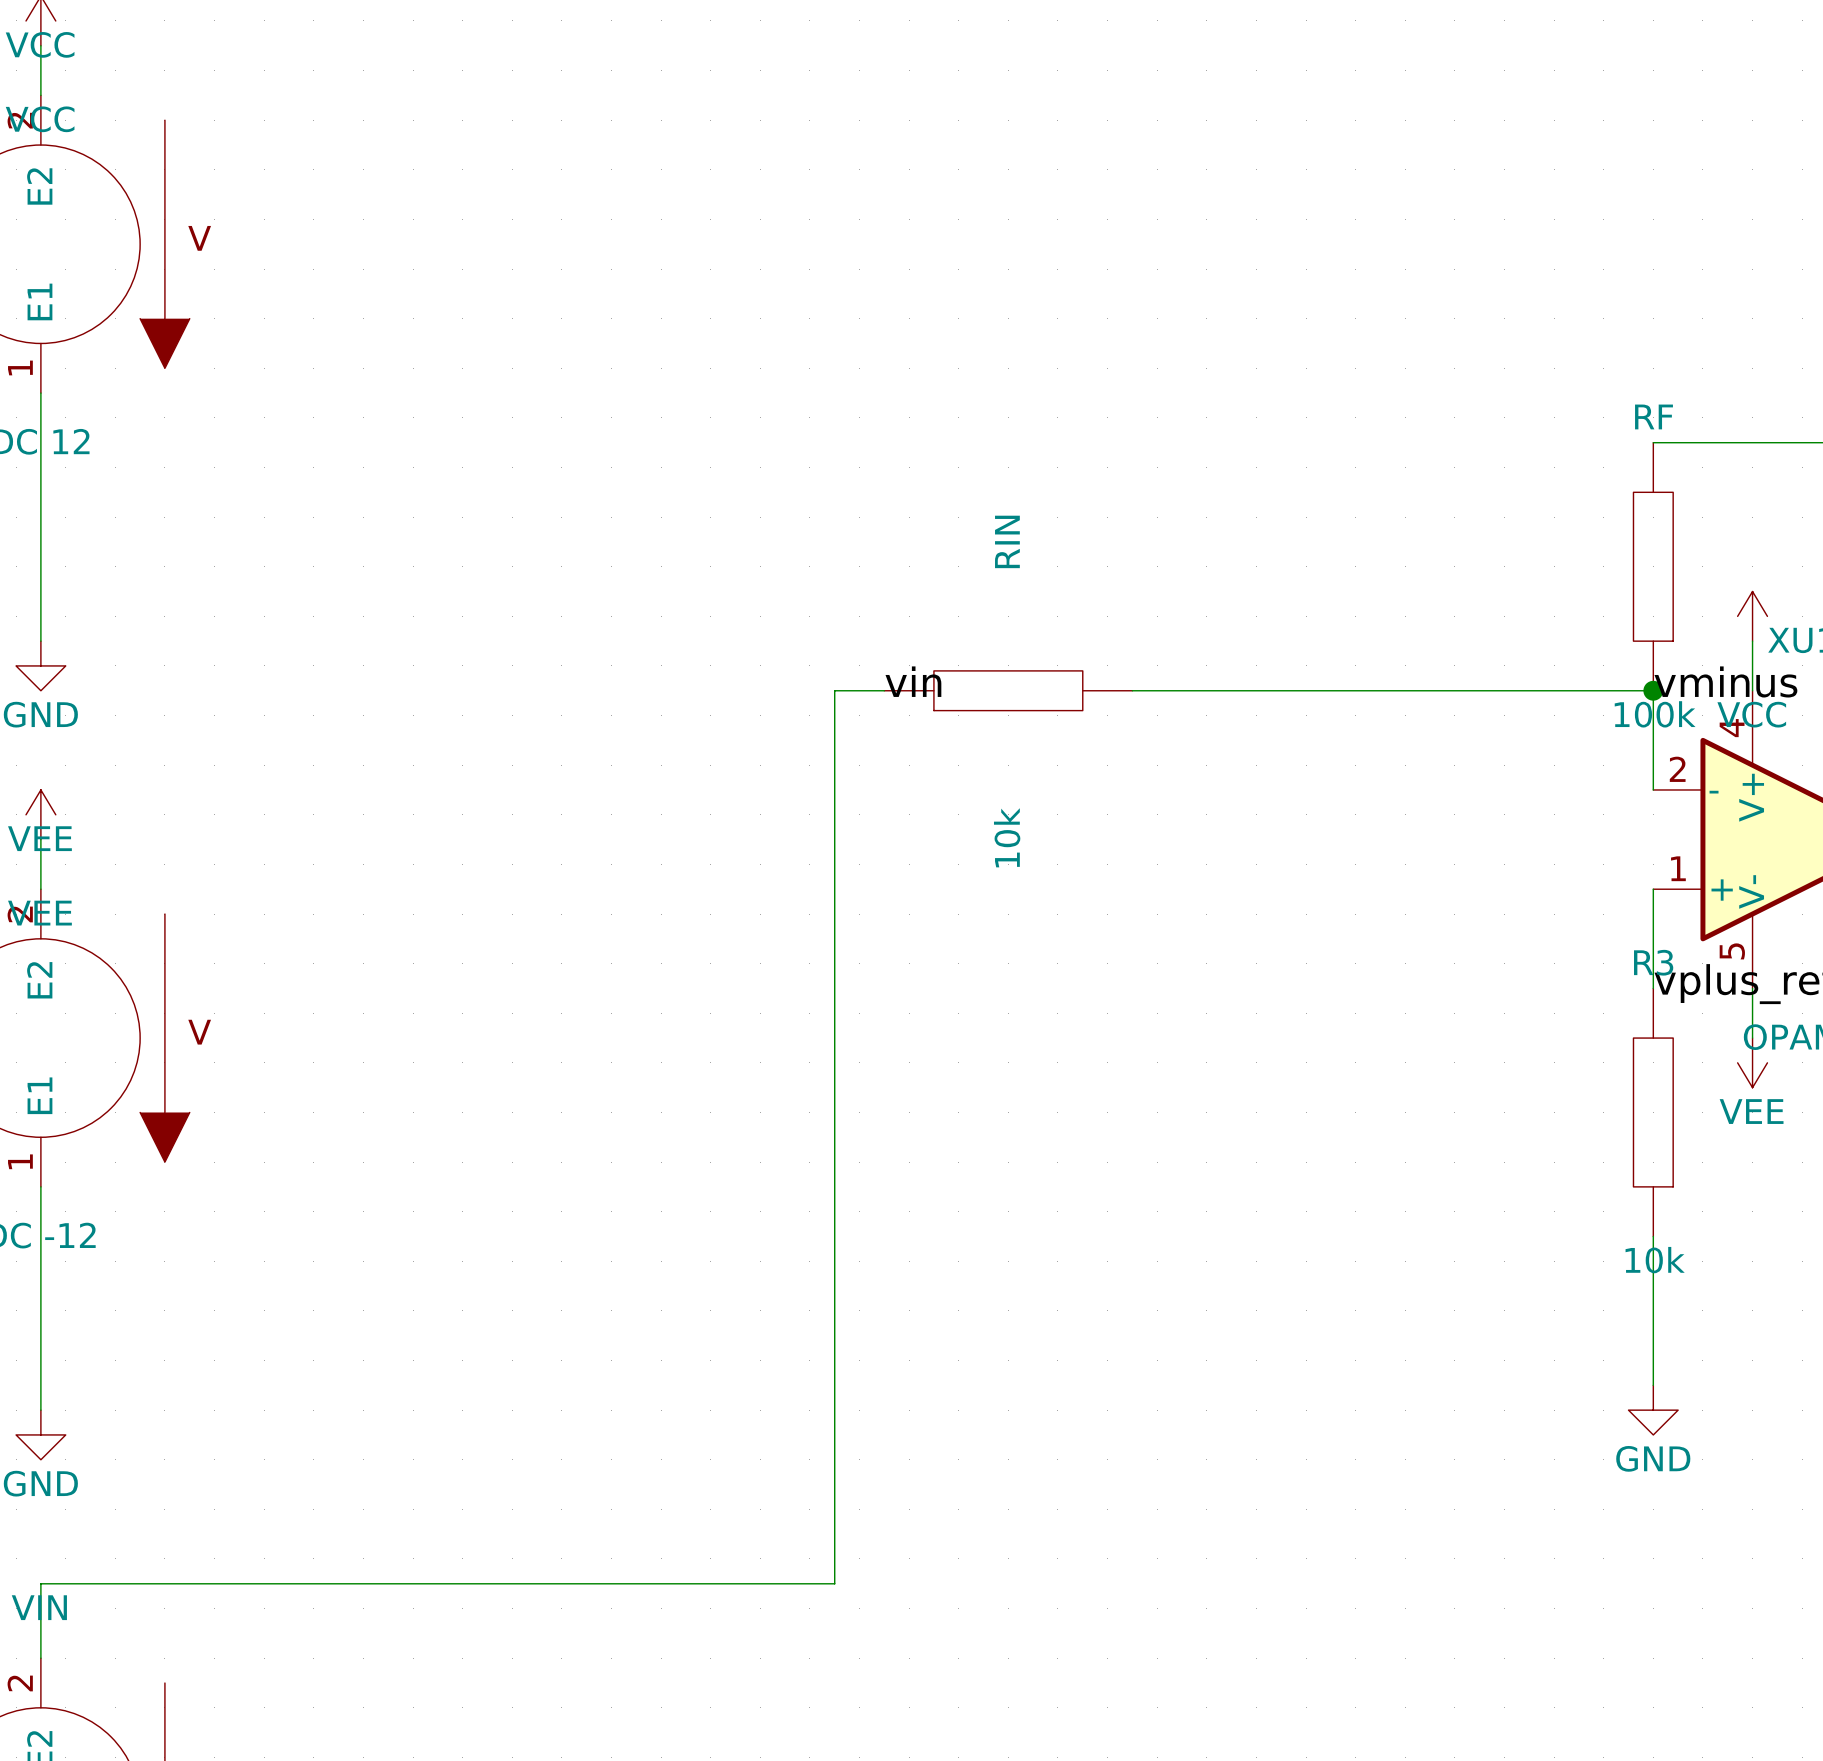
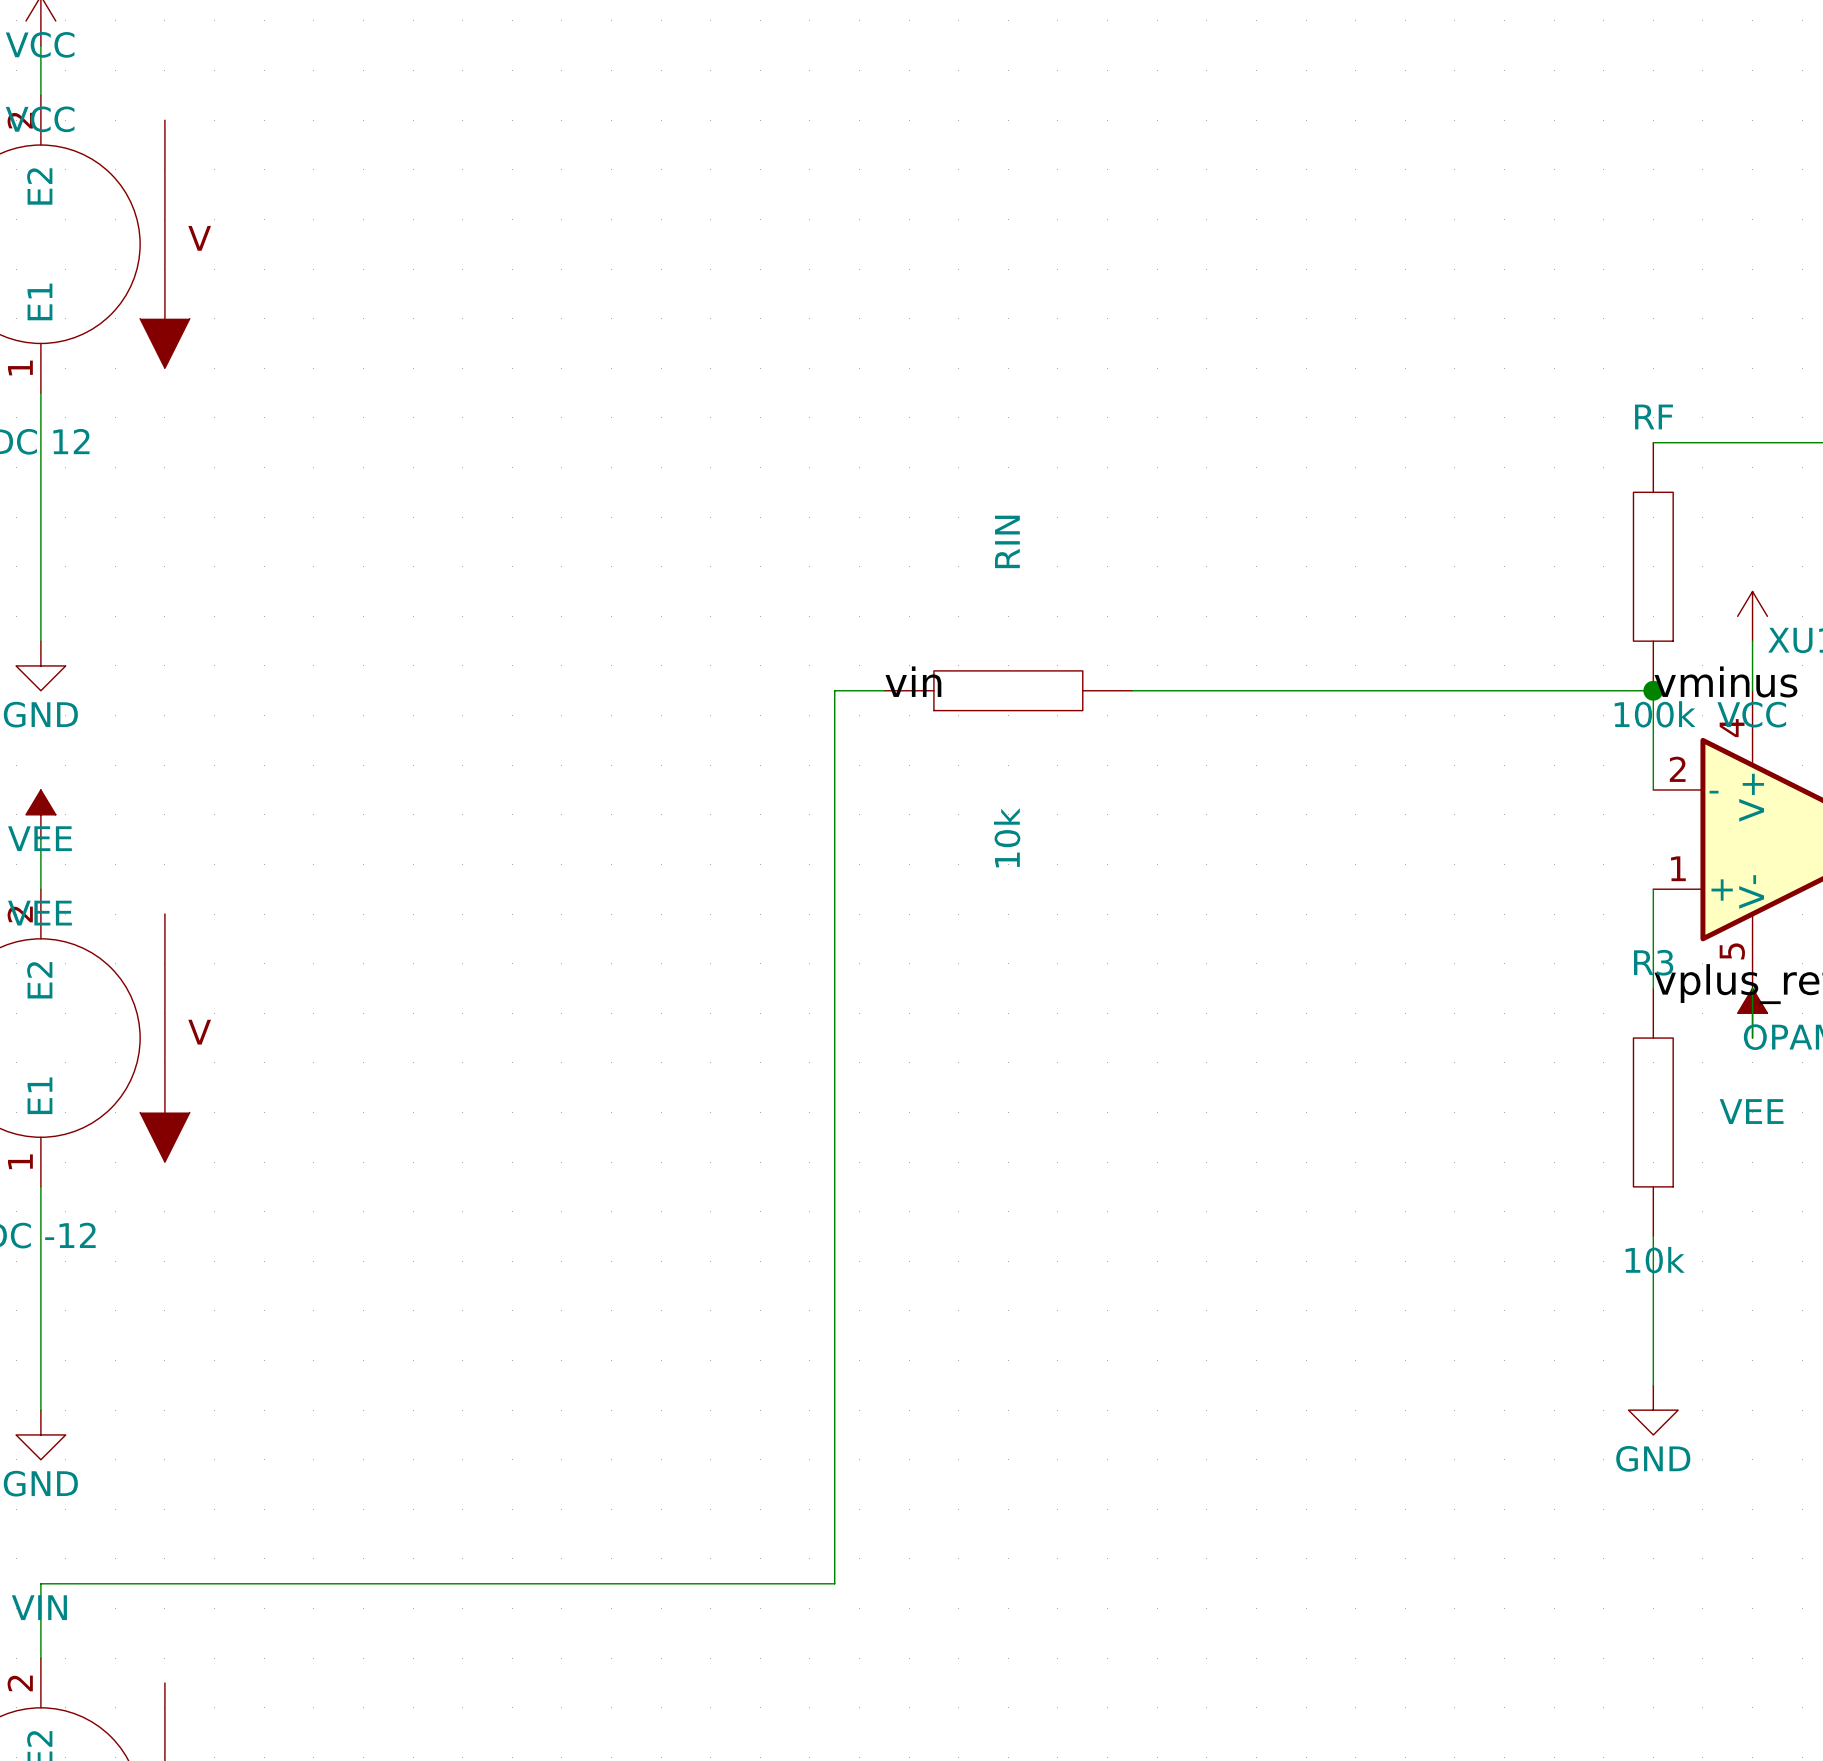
power symbol shape: [26, 789, 56, 840] -> [26, 789, 56, 840]
power symbol: none -> VEE (1752, 1013)
power symbol: VEE (1752, 1062) -> none

